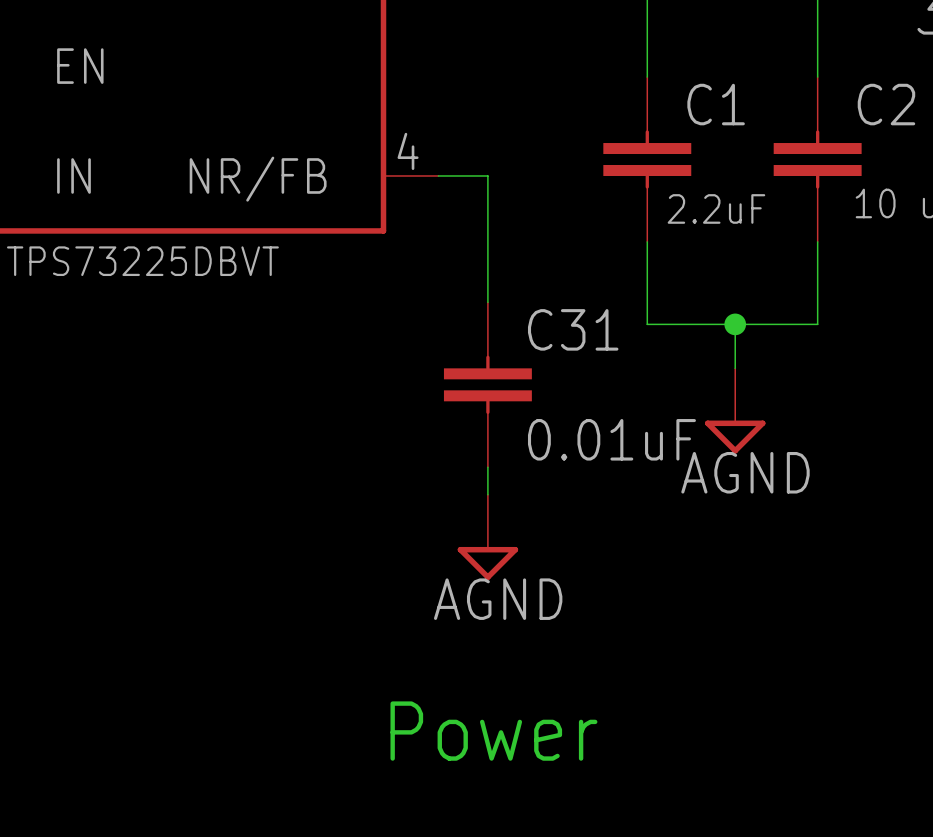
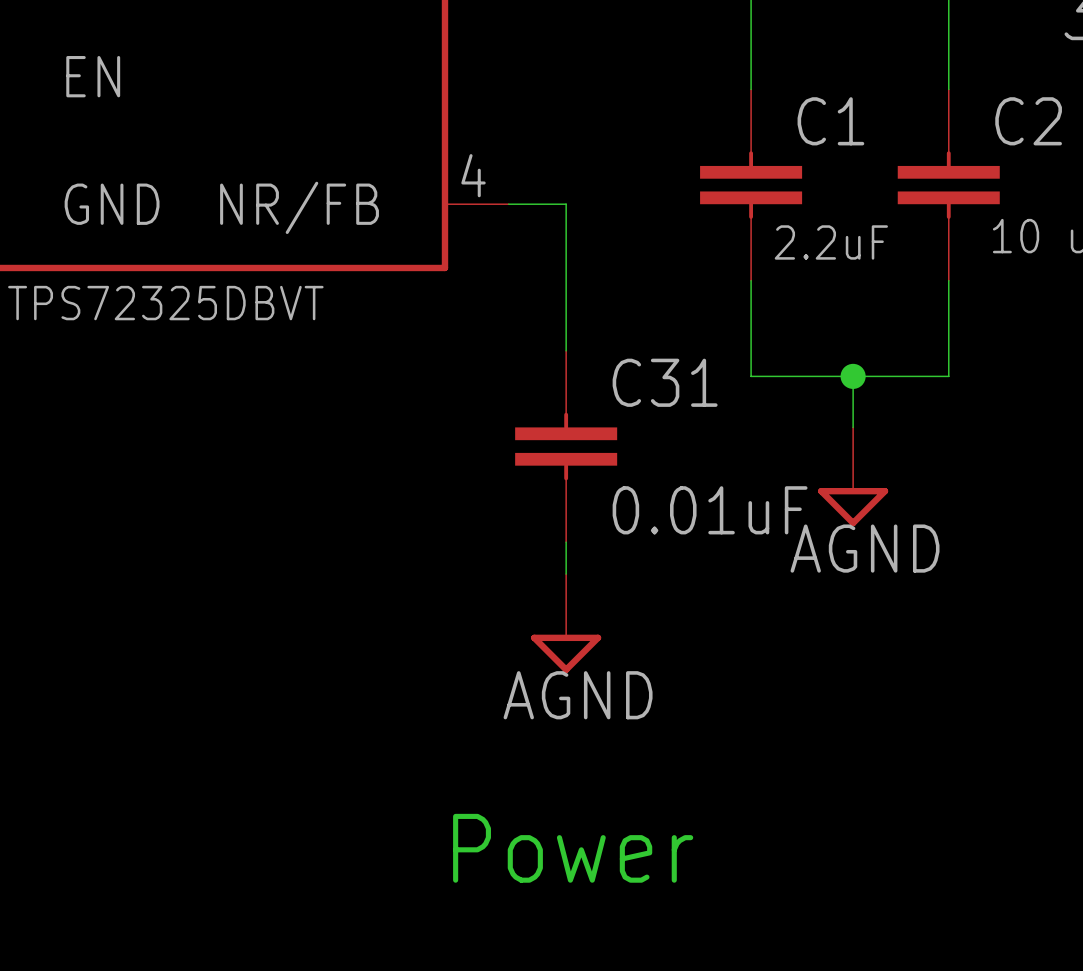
part pin name: IN (73, 175) -> GND (112, 204)
part value: TPS73225DBVT (142, 261) -> TPS72325DBVT (165, 303)

